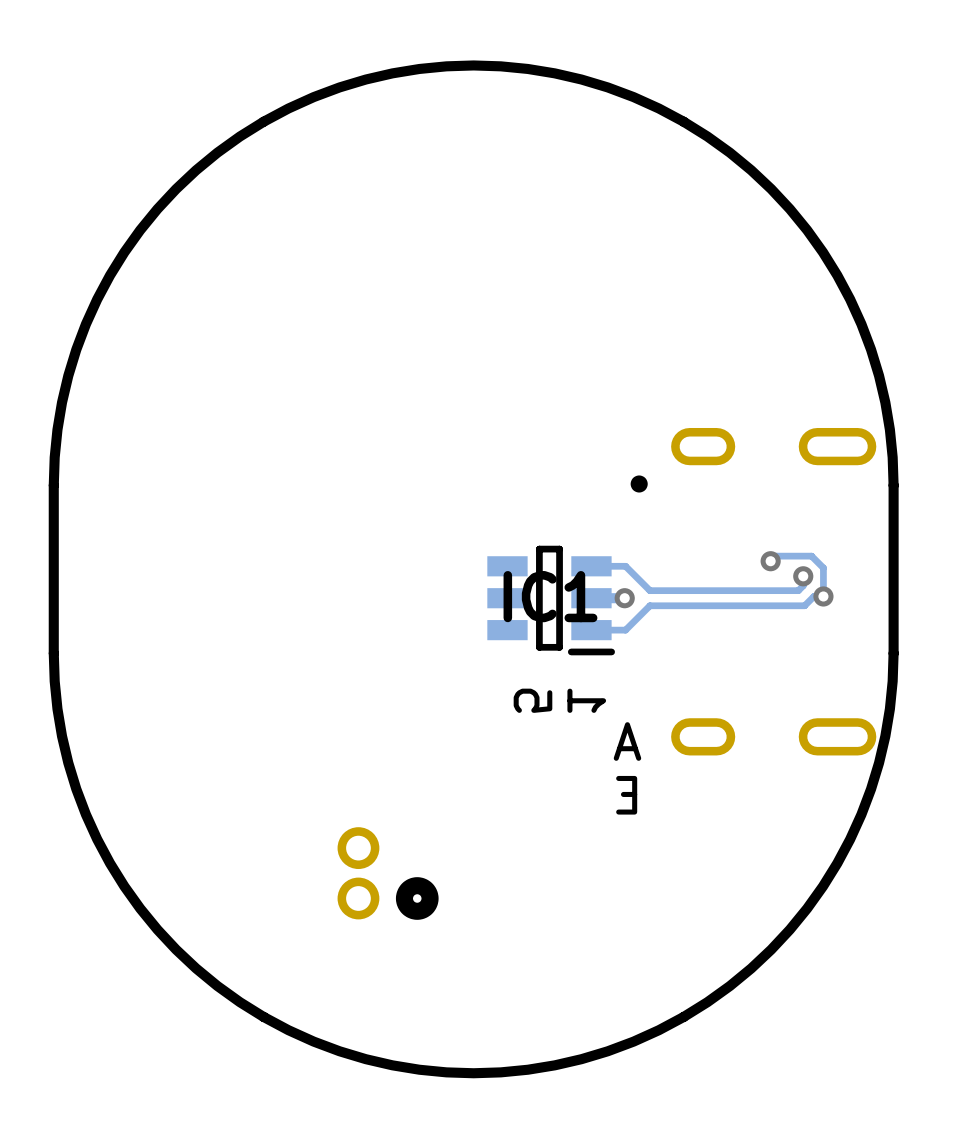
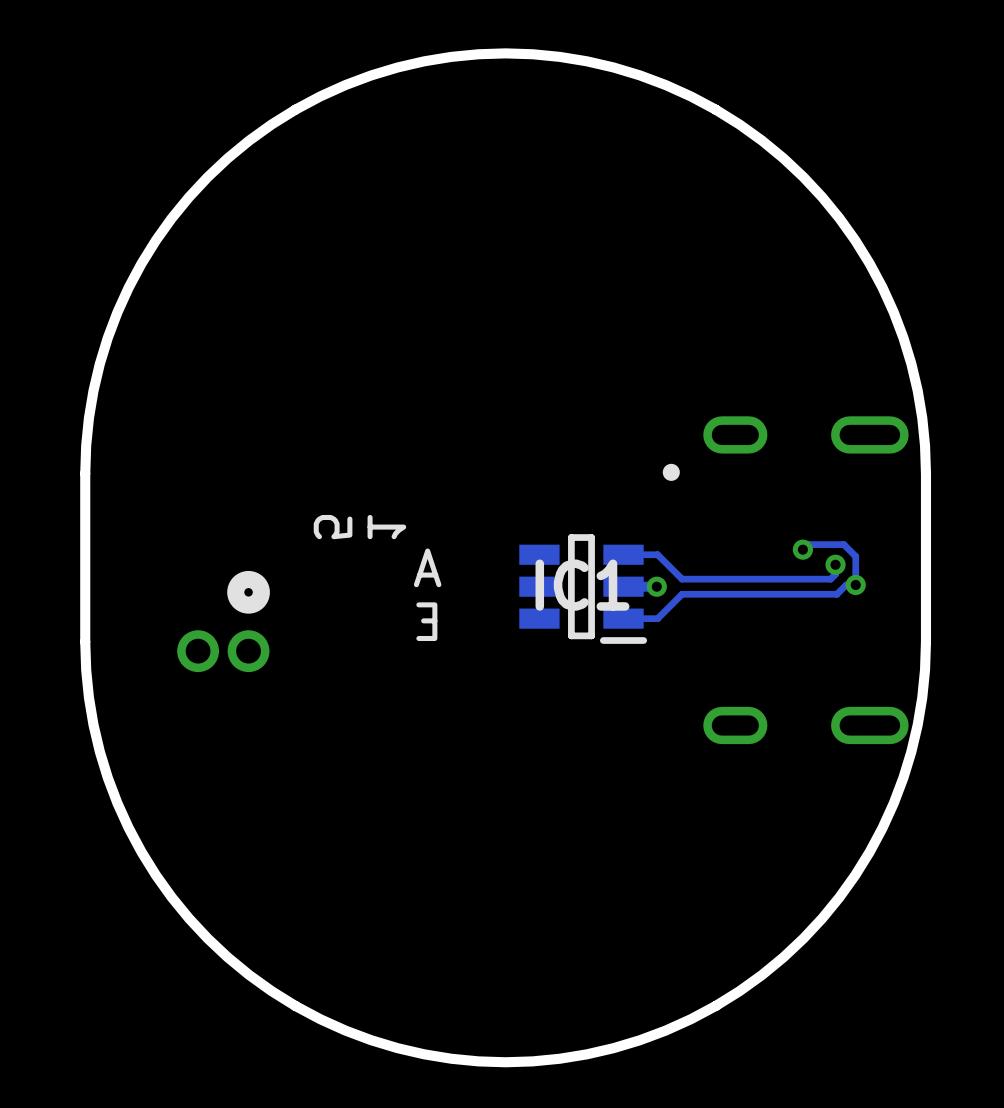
part position: (577, 751) -> (377, 577)
part rotation: 0° (388, 873) -> 90° counterclockwise (223, 621)
part position: (388, 873) -> (223, 621)

